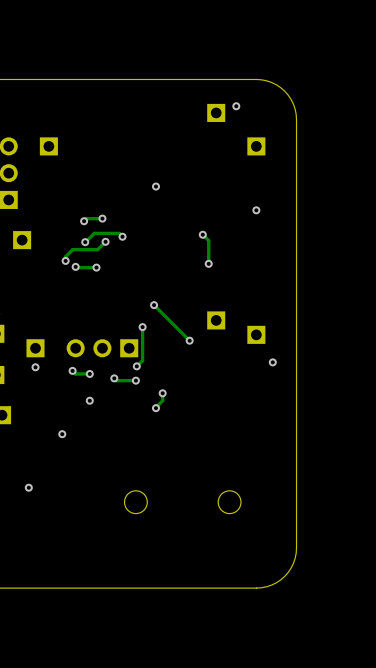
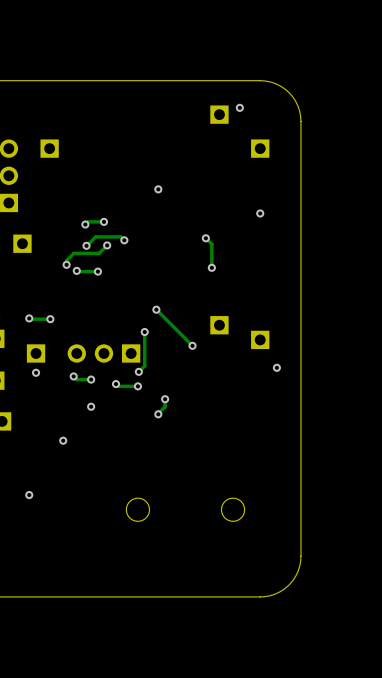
track: none -> (29, 318) (50, 319)
via: none -> (29, 318)
via: none -> (50, 319)

